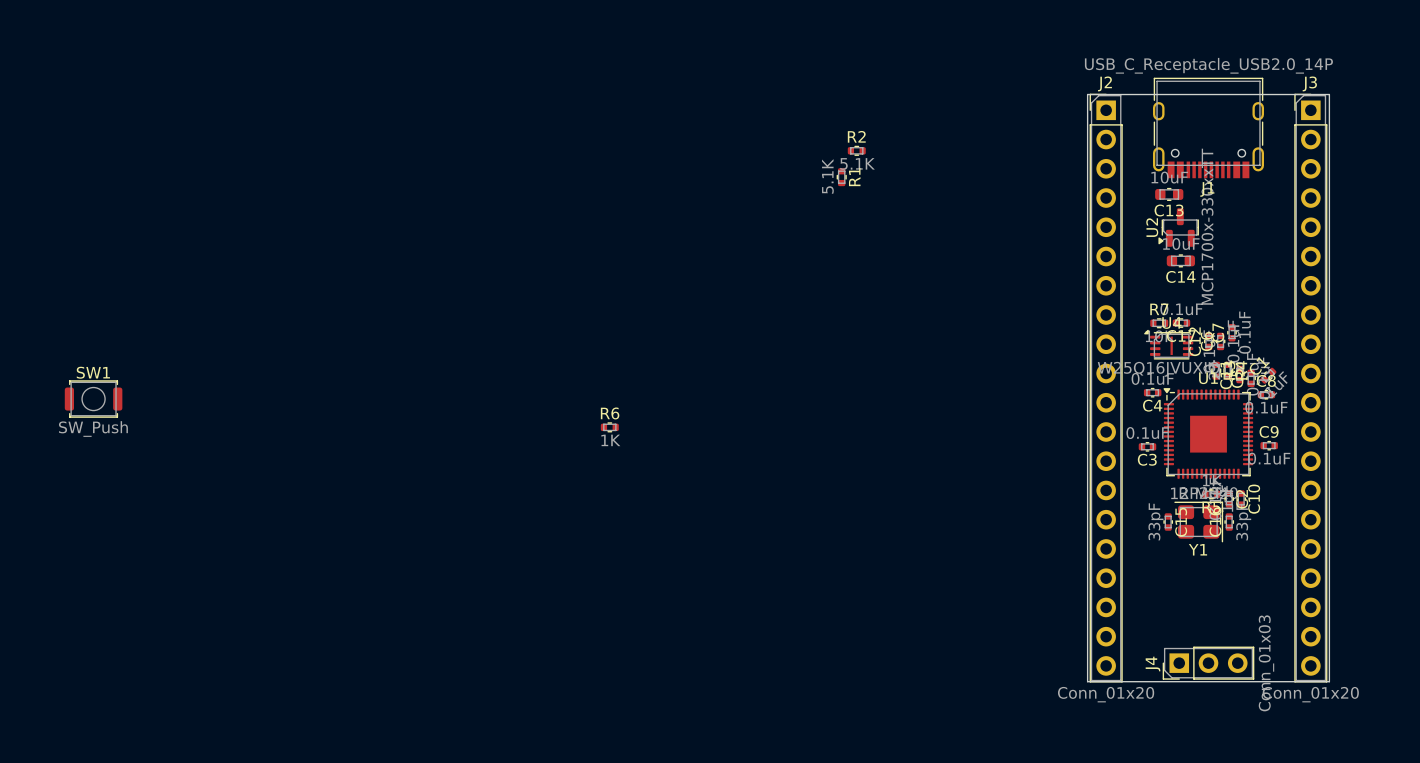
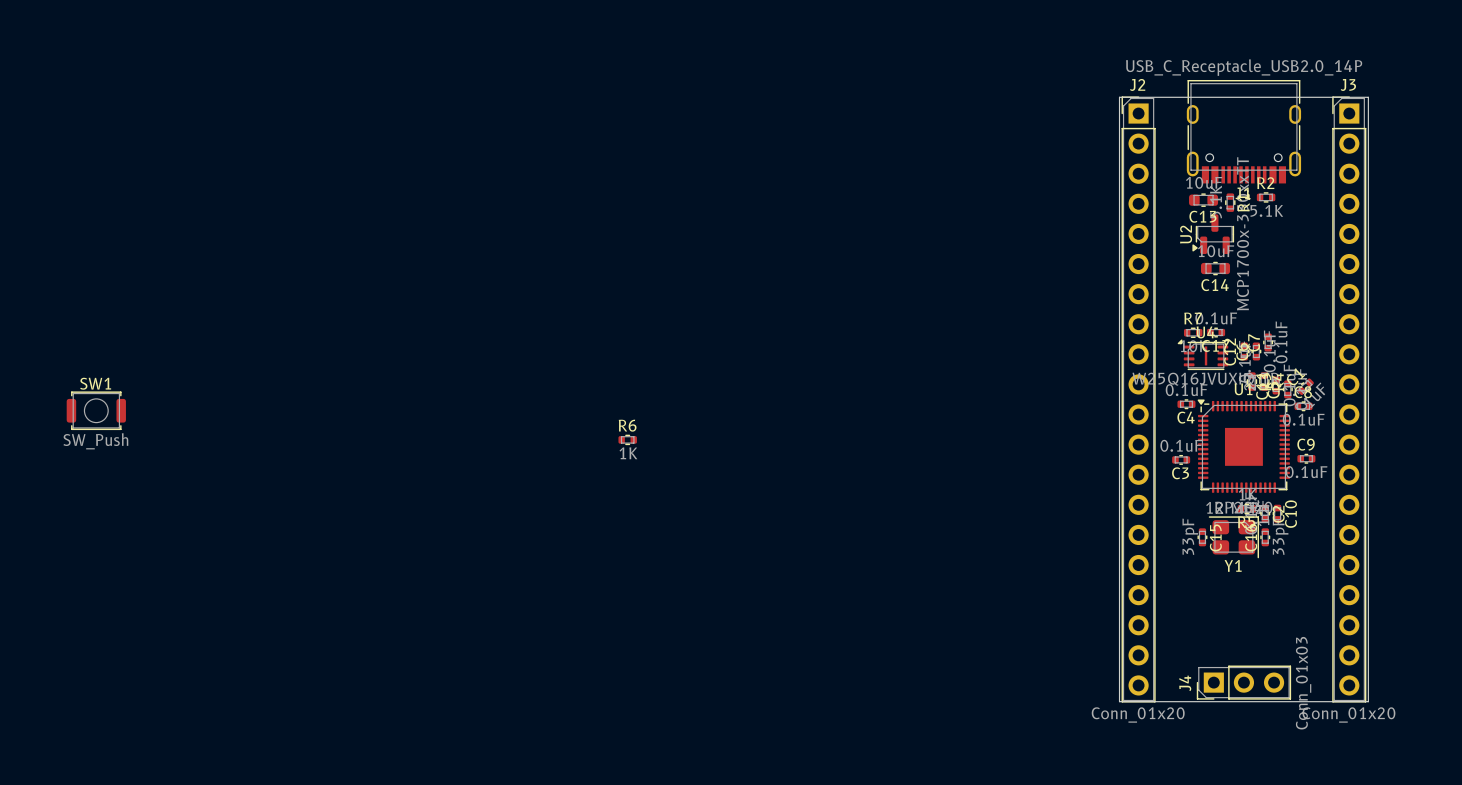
R2 position: (856, 150) -> (1266, 197)
R1 position: (841, 177) -> (1230, 202)

